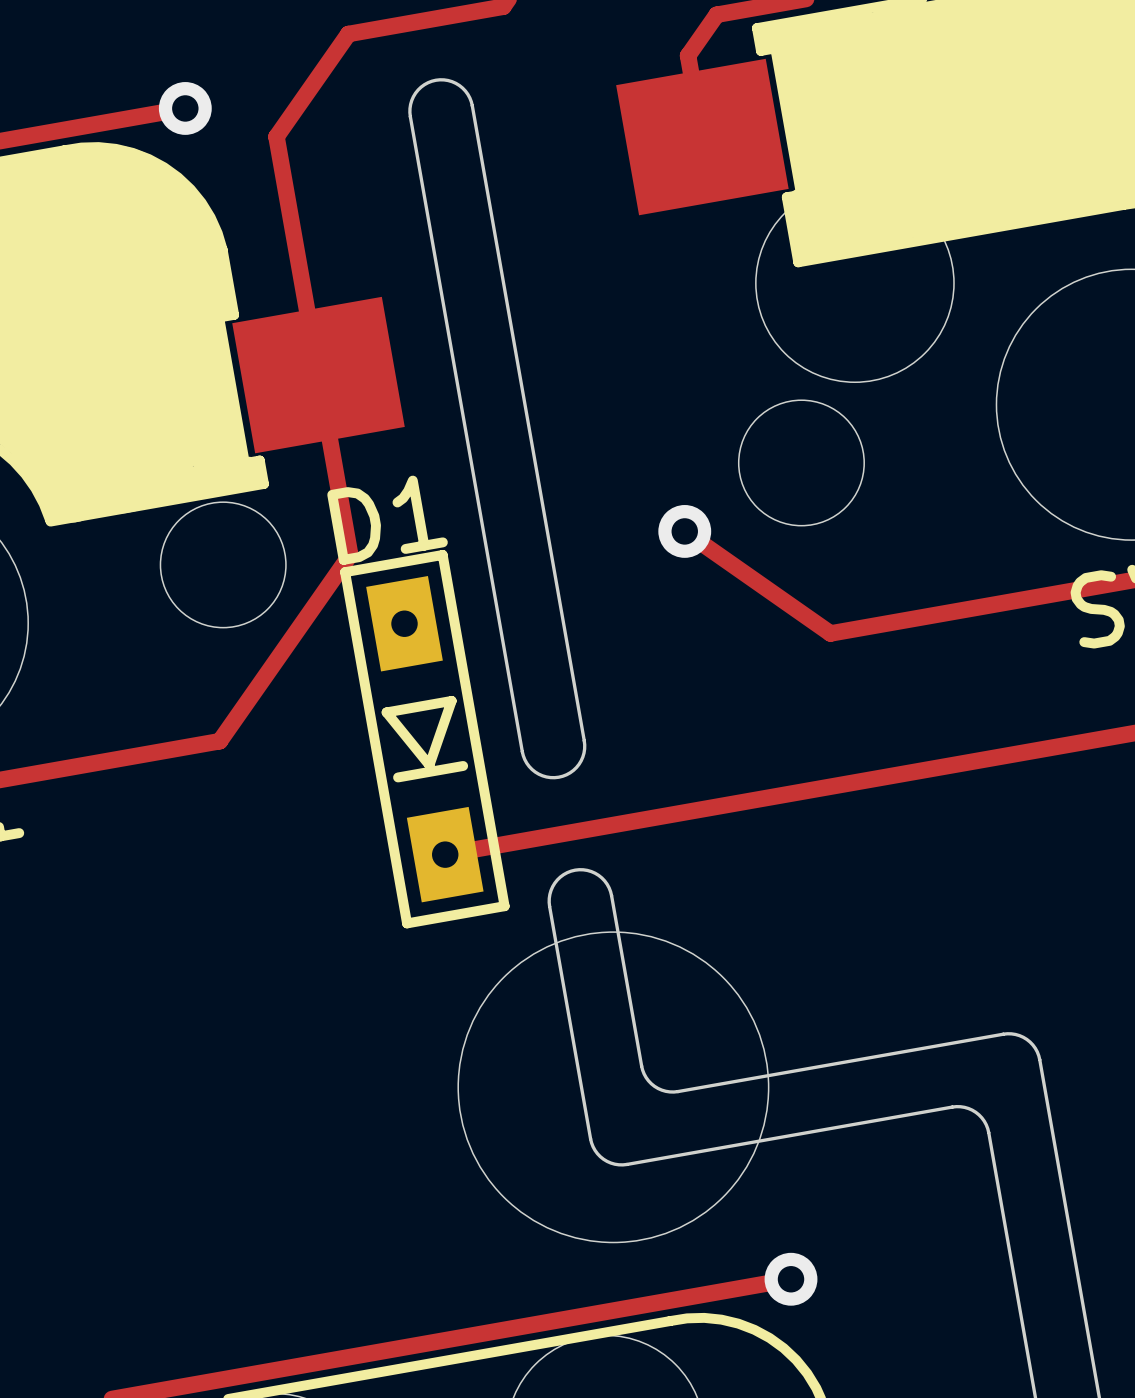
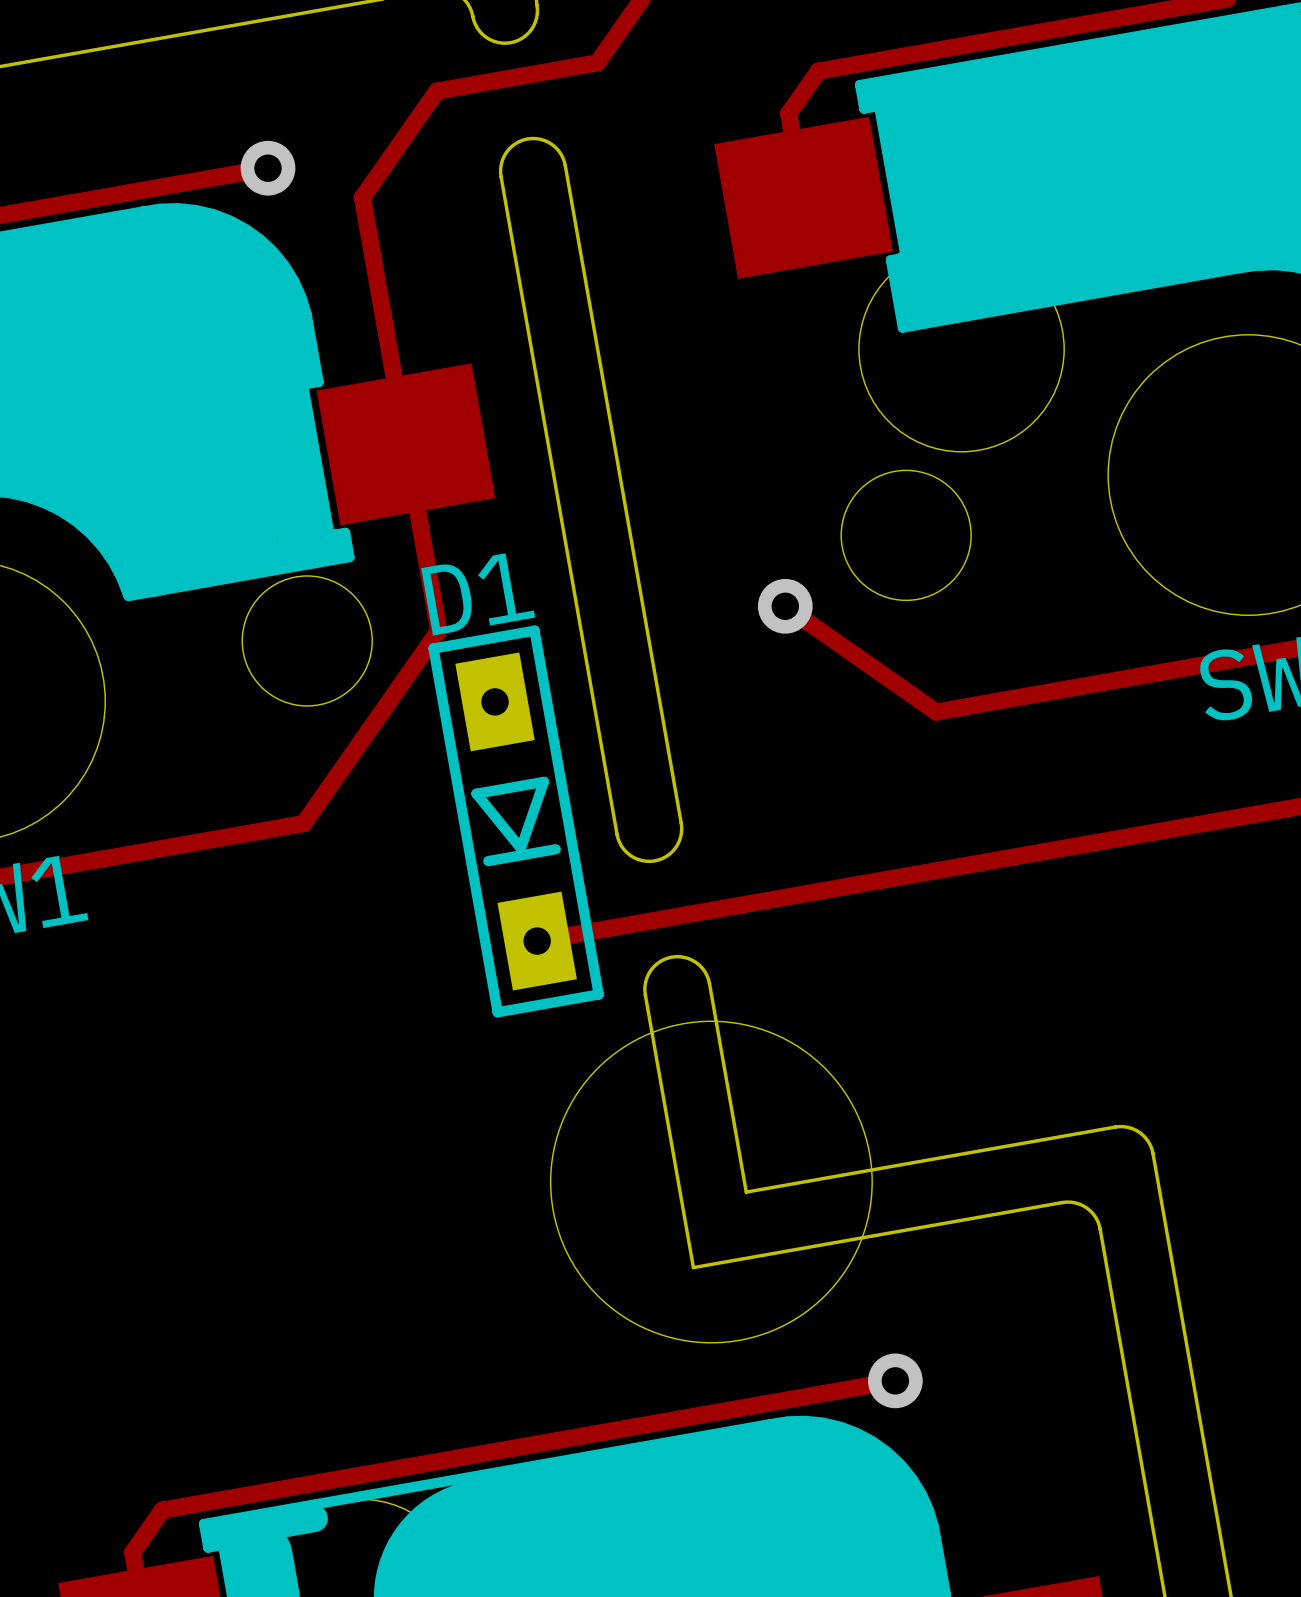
board edge: (641, 1066) (646, 1077) (654, 1086) (665, 1091) (678, 1091) -> (740, 1160) (746, 1192) (778, 1186)
board edge: (590, 1138) (595, 1150) (603, 1159) (614, 1164) (627, 1164) -> (687, 1235) (693, 1267) (725, 1261)

